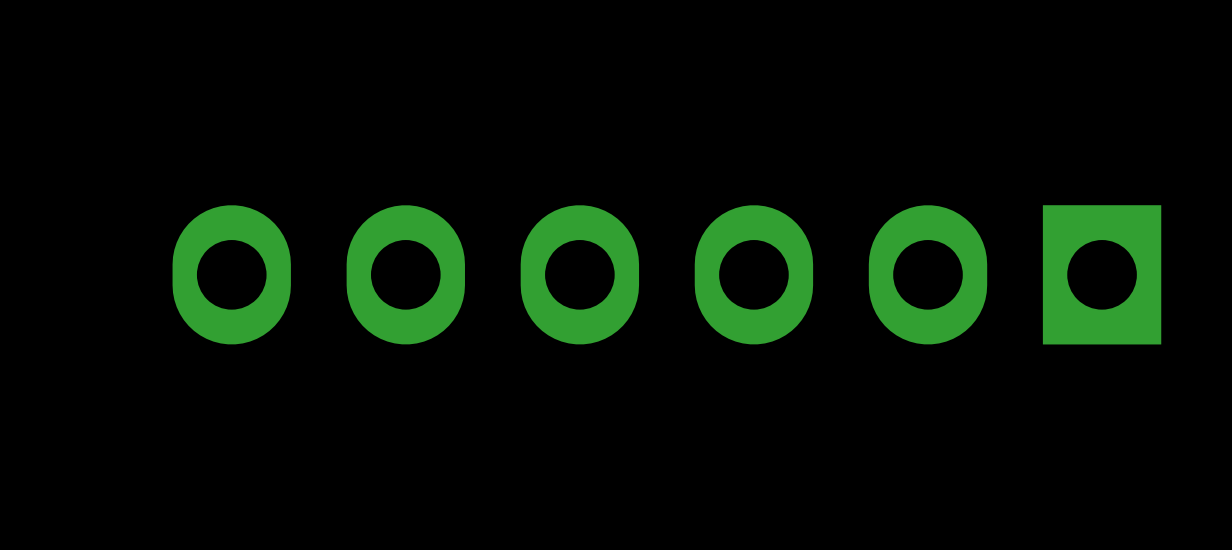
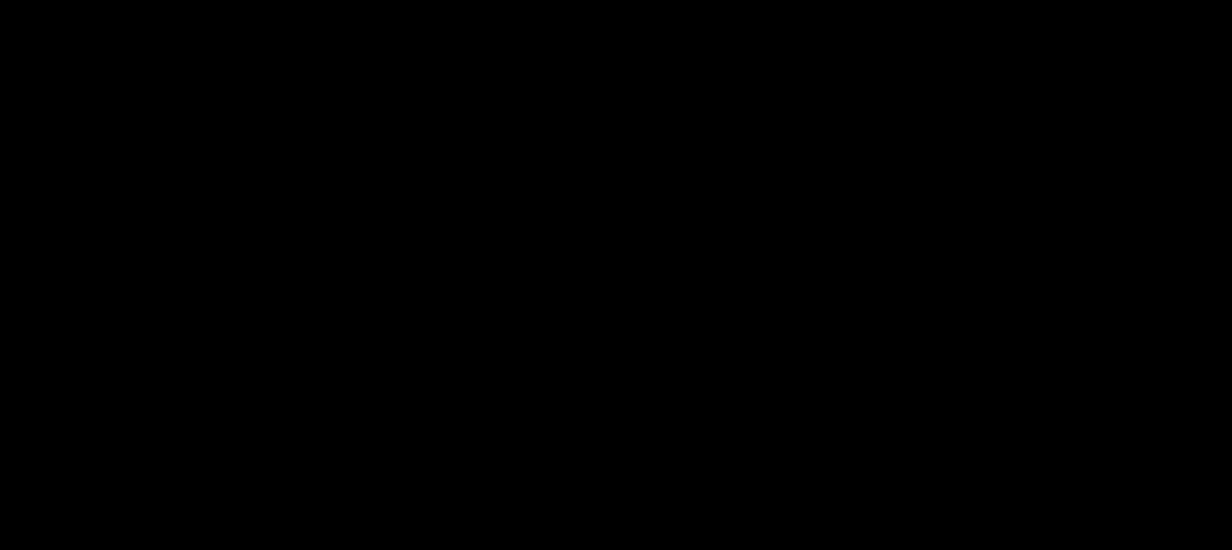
part: (666, 274) -> none

